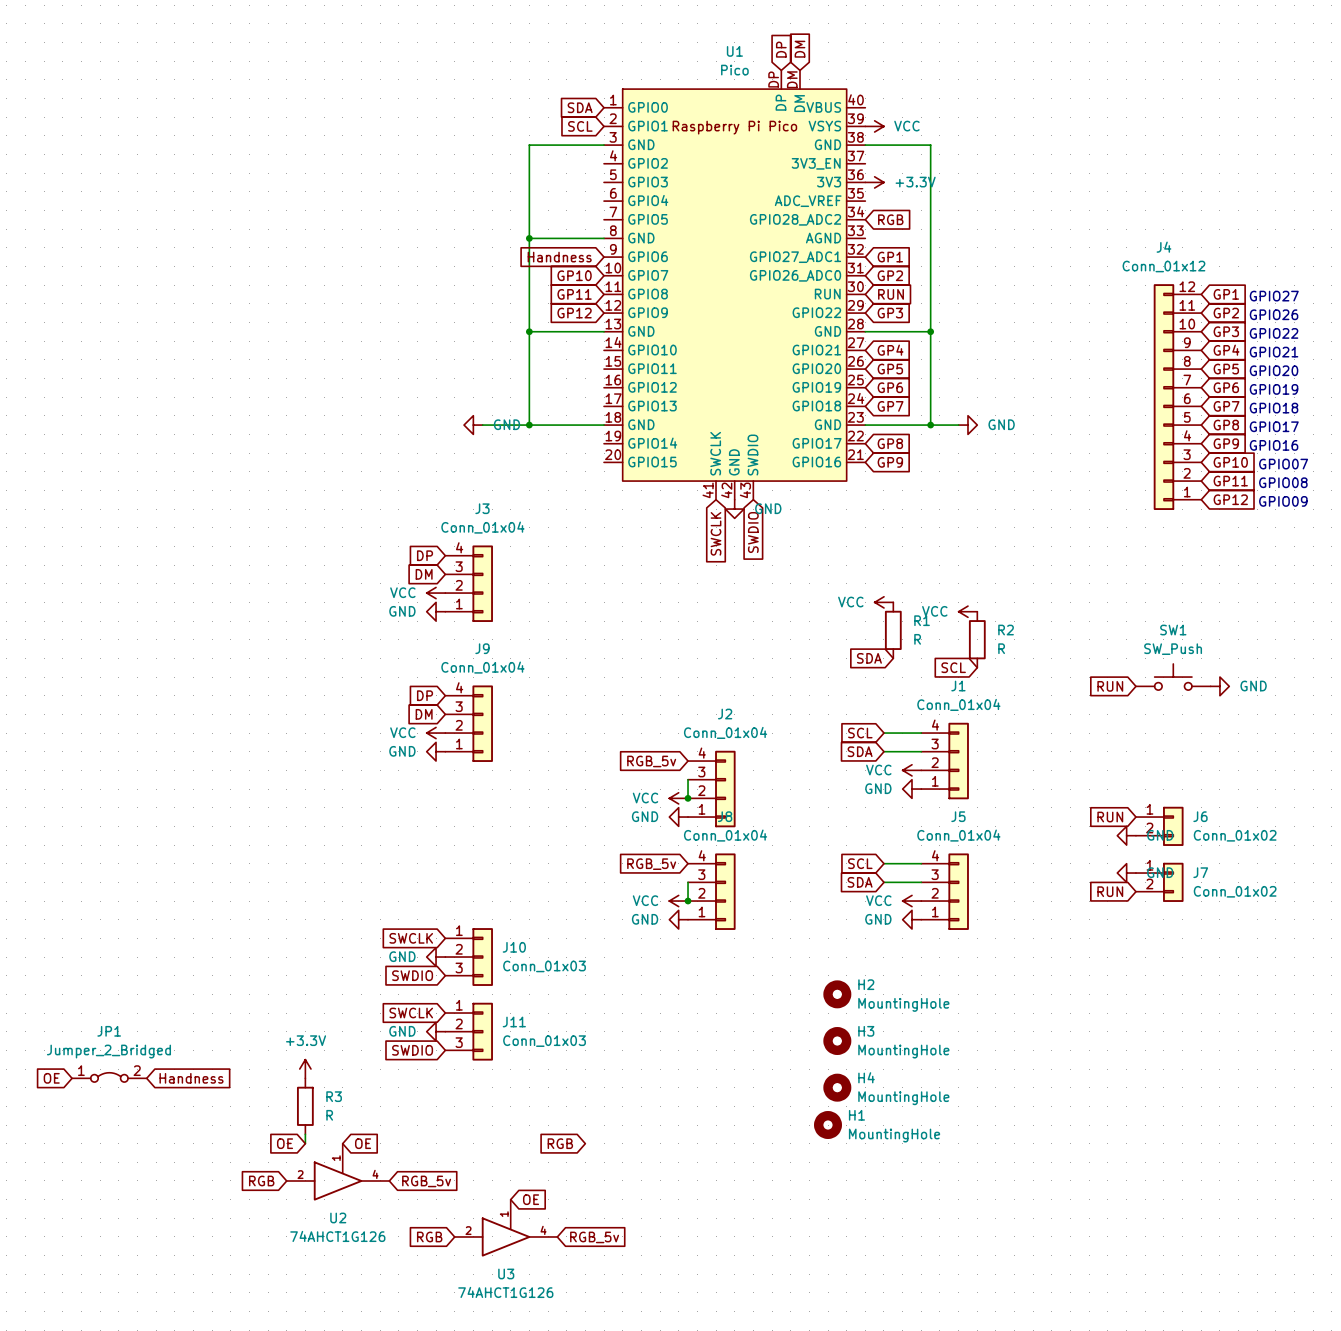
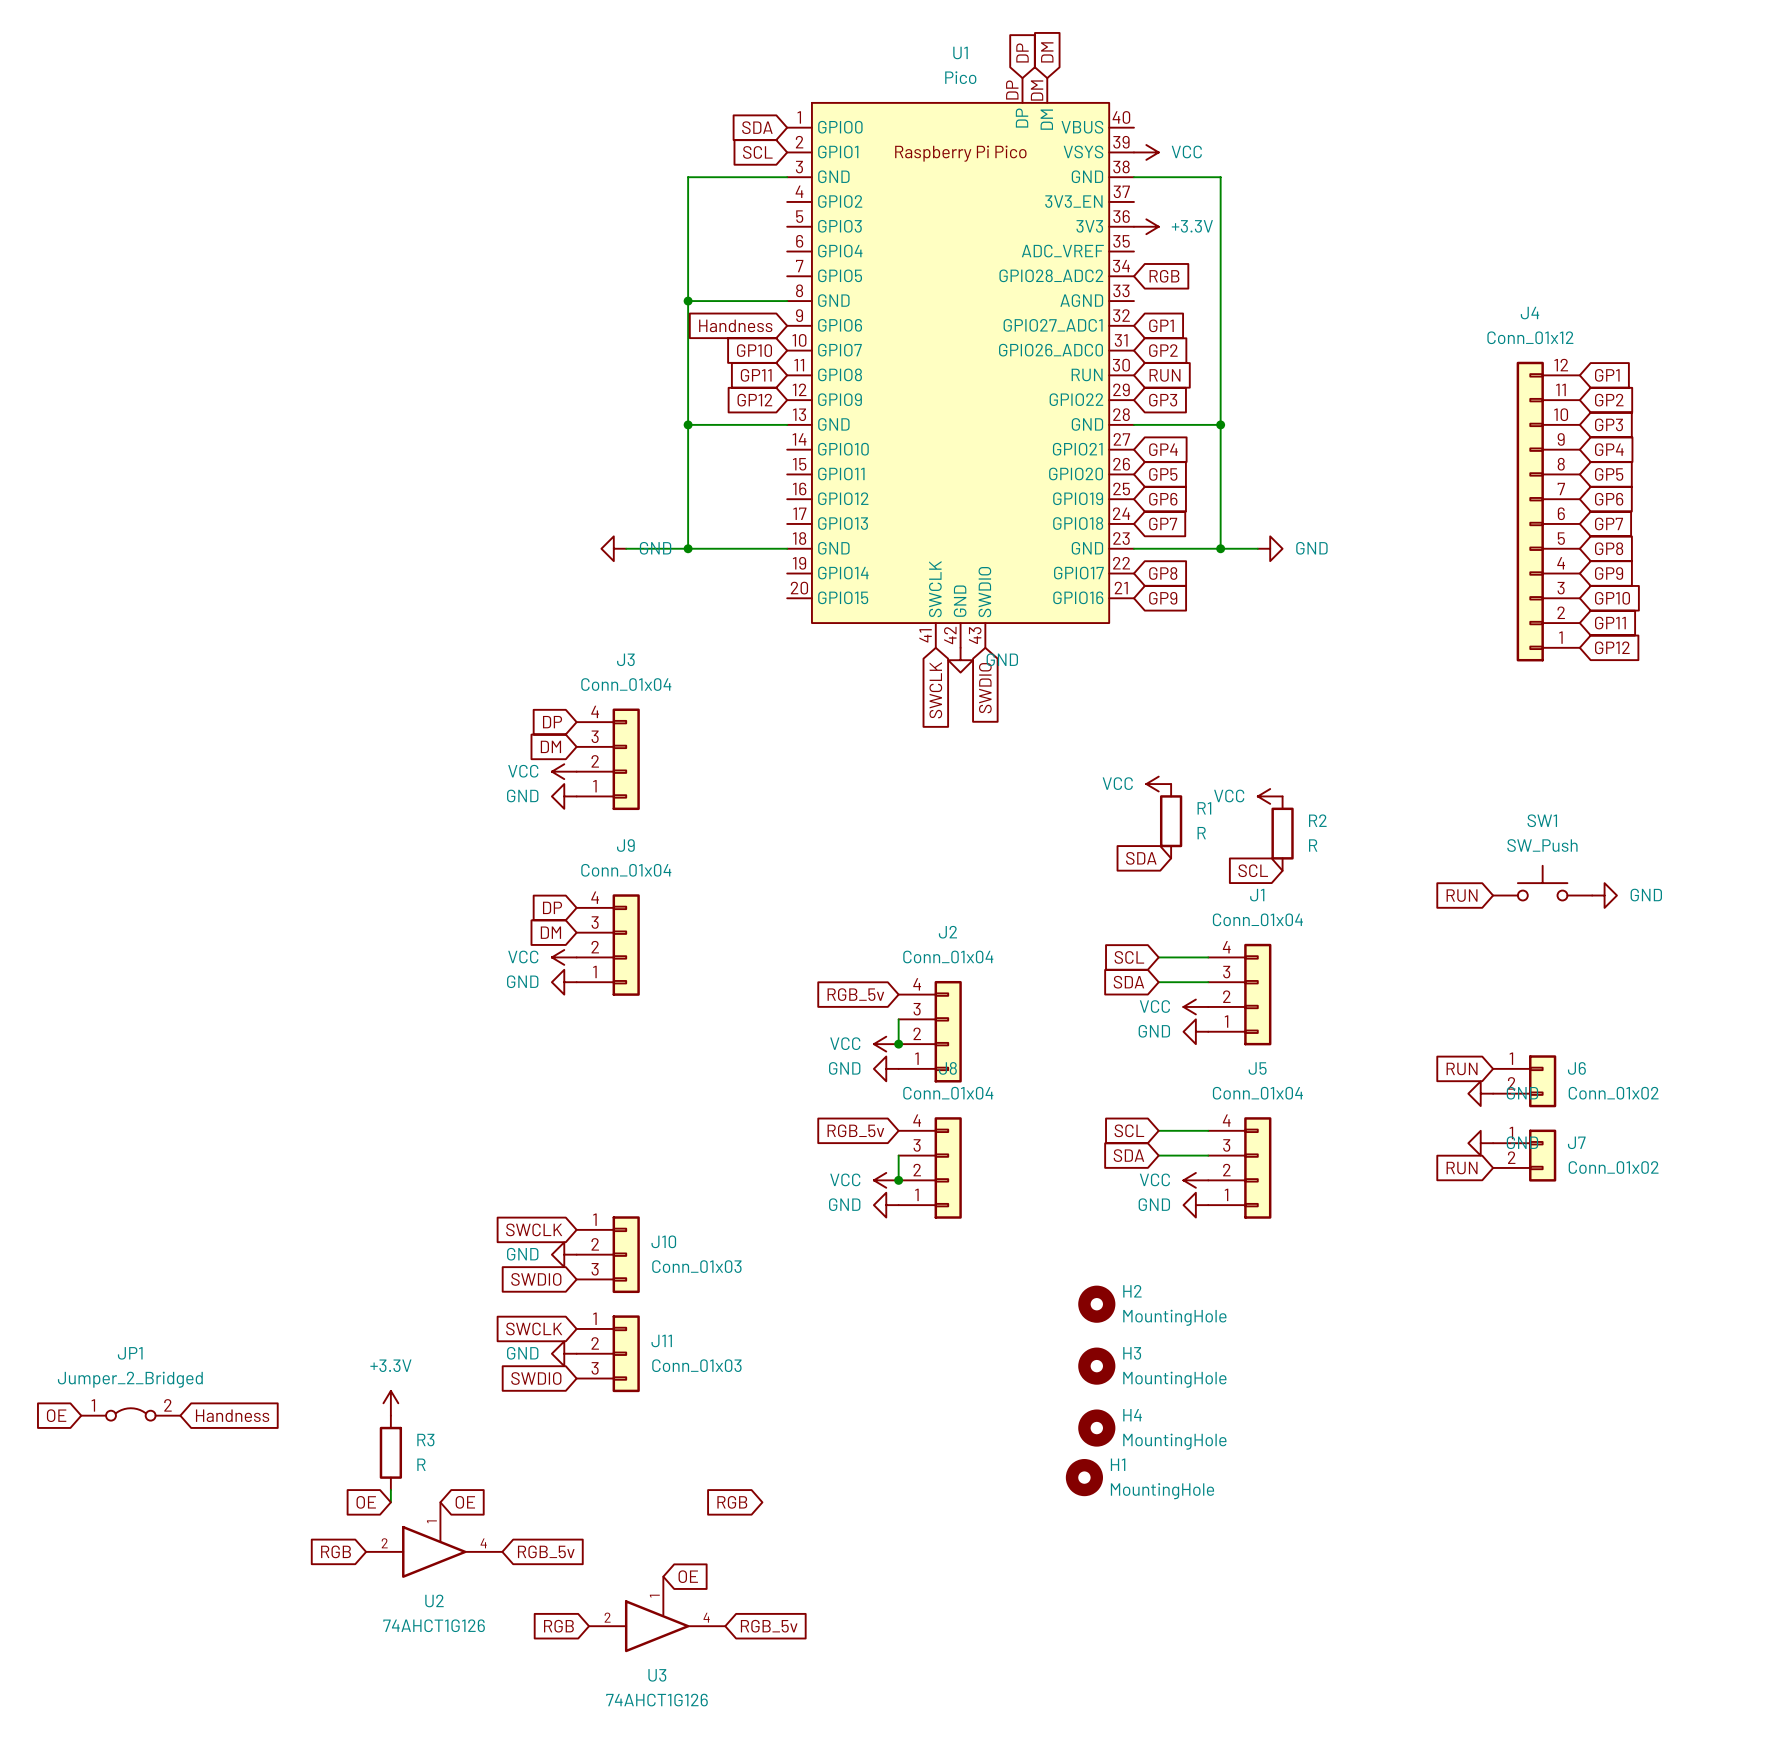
text: GPIO27 (1274, 296) -> none
text: GPIO26 (1274, 314) -> none
text: GPIO22 (1274, 333) -> none
text: GPIO21 (1274, 352) -> none
text: GPIO20 (1274, 370) -> none
text: GPIO19 (1274, 389) -> none
text: GPIO18 (1274, 408) -> none
text: GPIO17 (1274, 426) -> none
text: GPIO16 (1274, 445) -> none
text: GPIO07 (1283, 464) -> none
text: GPIO08 (1283, 482) -> none
text: GPIO09 (1283, 501) -> none

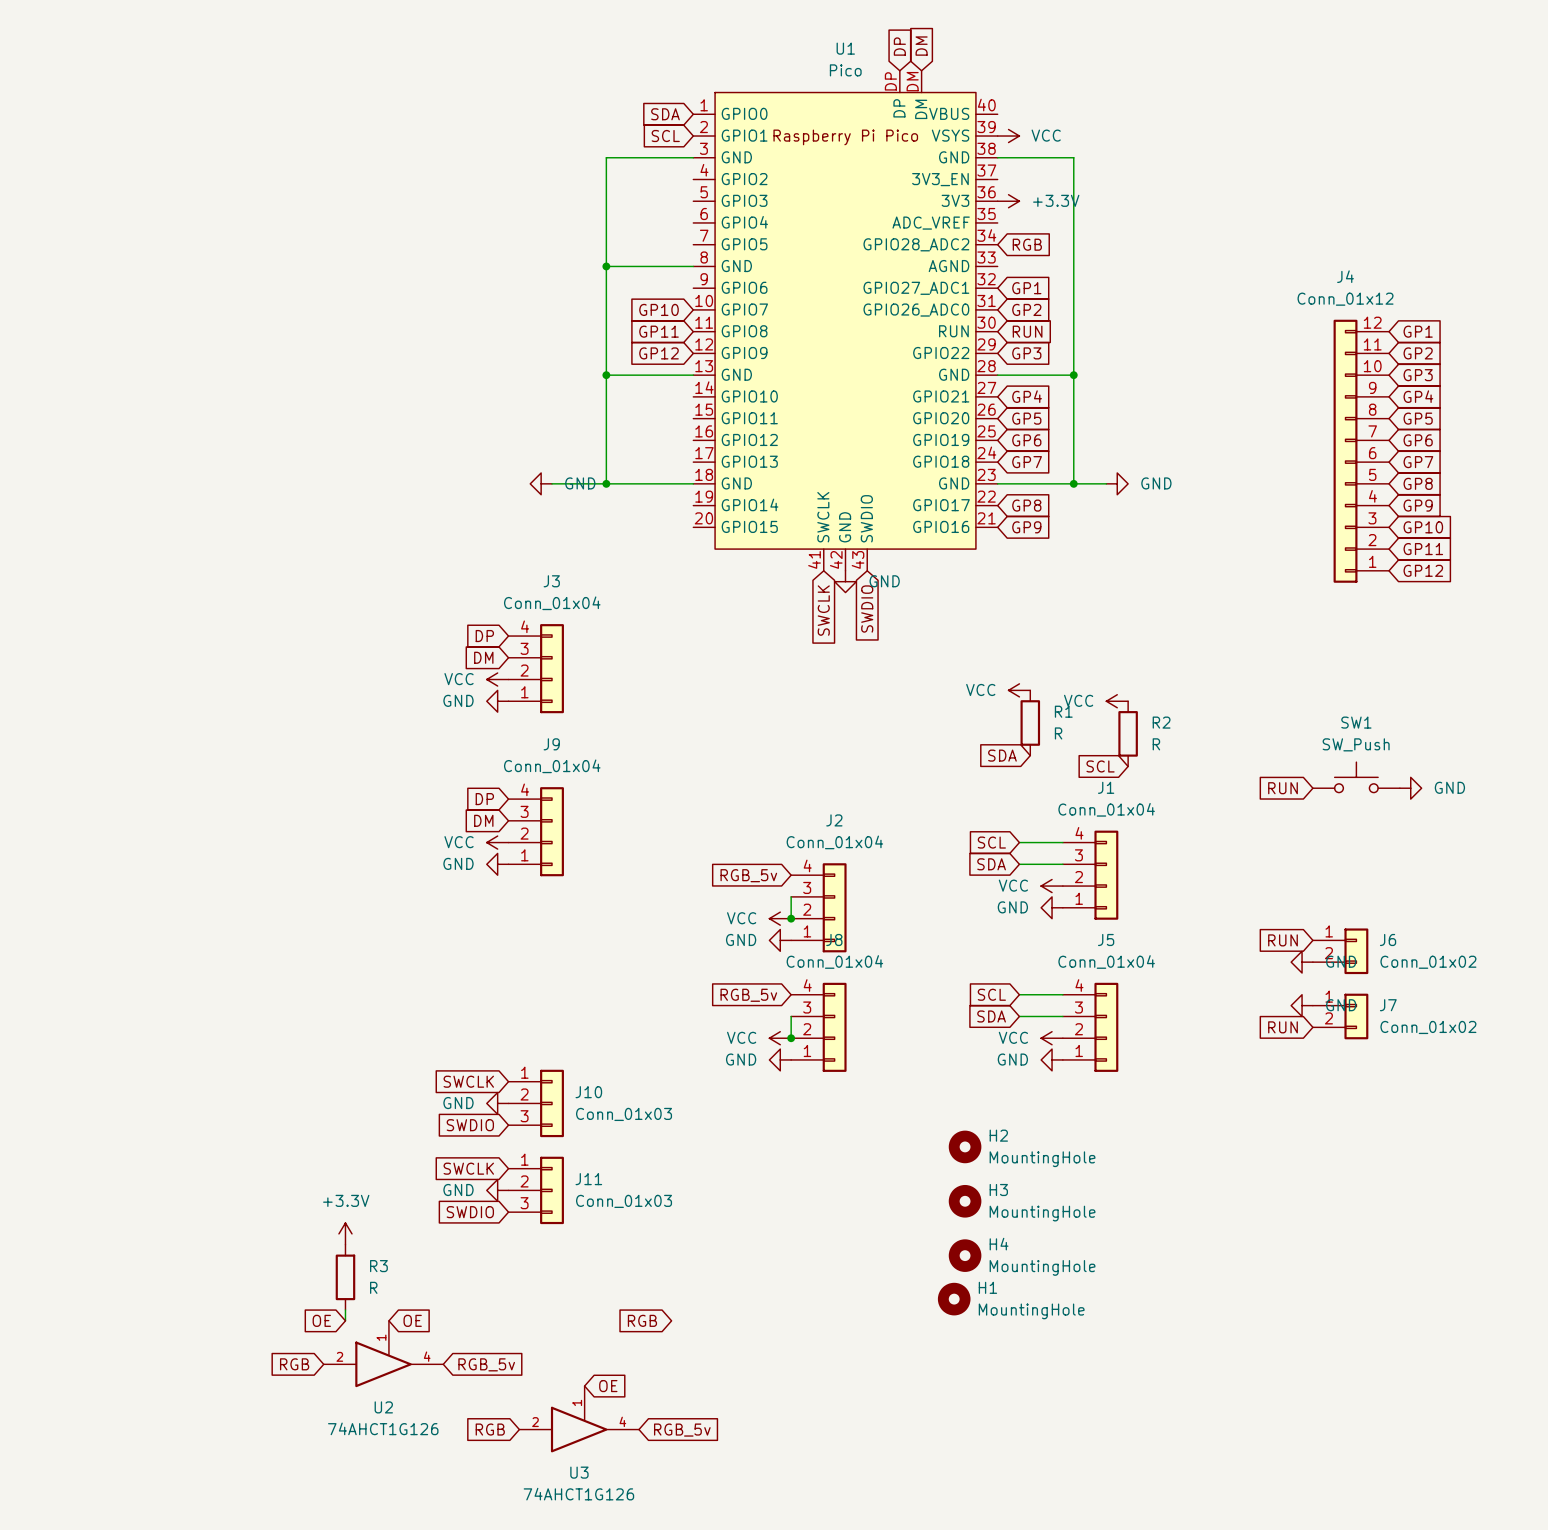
global label: Handness (735, 325) -> none
JP1: Jumper_2_Bridged (130, 1414) -> none
global label: OE (56, 1415) -> none
global label: Handness (232, 1415) -> none

